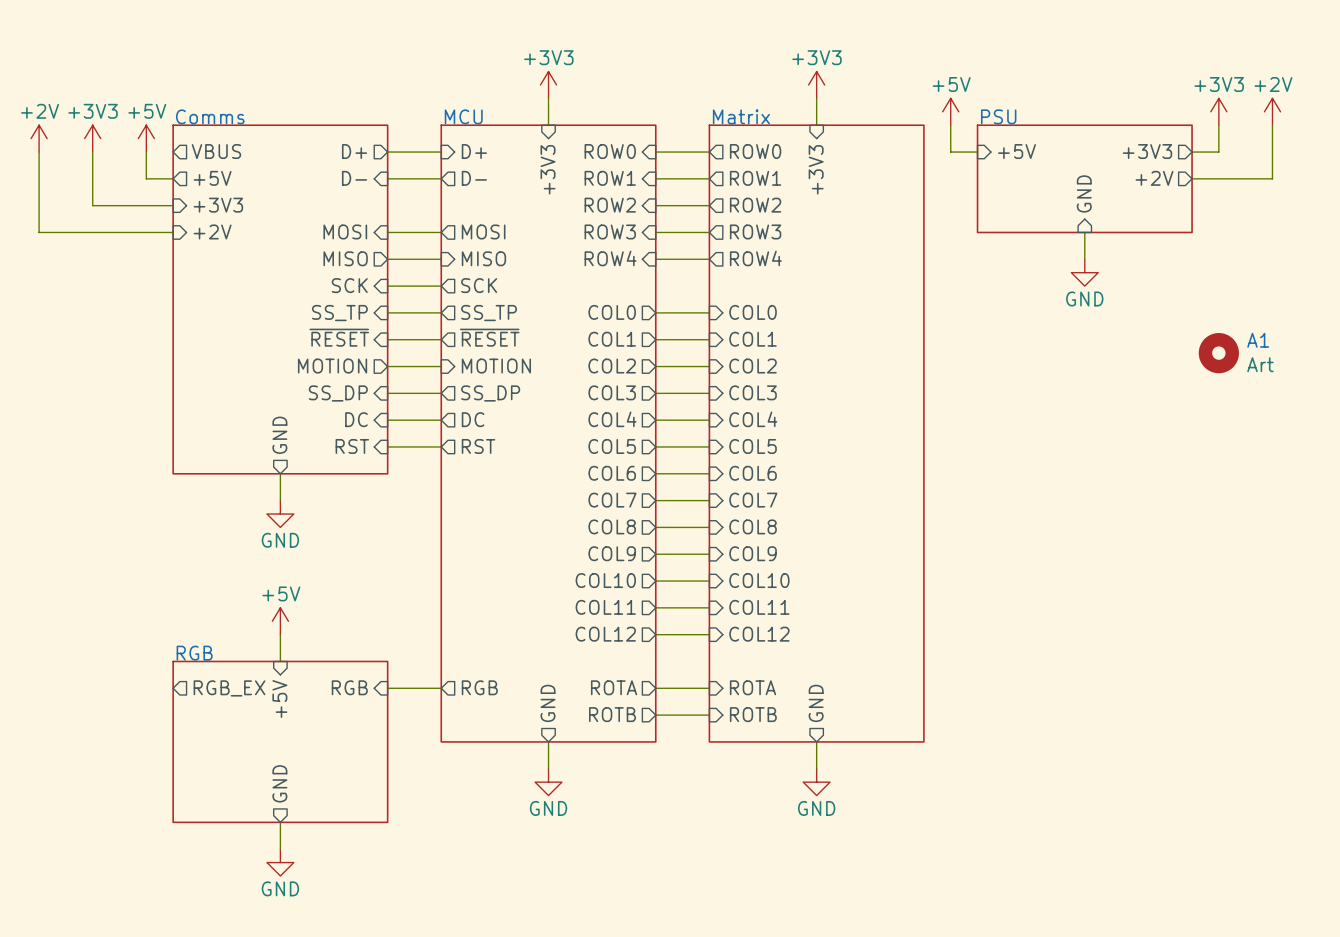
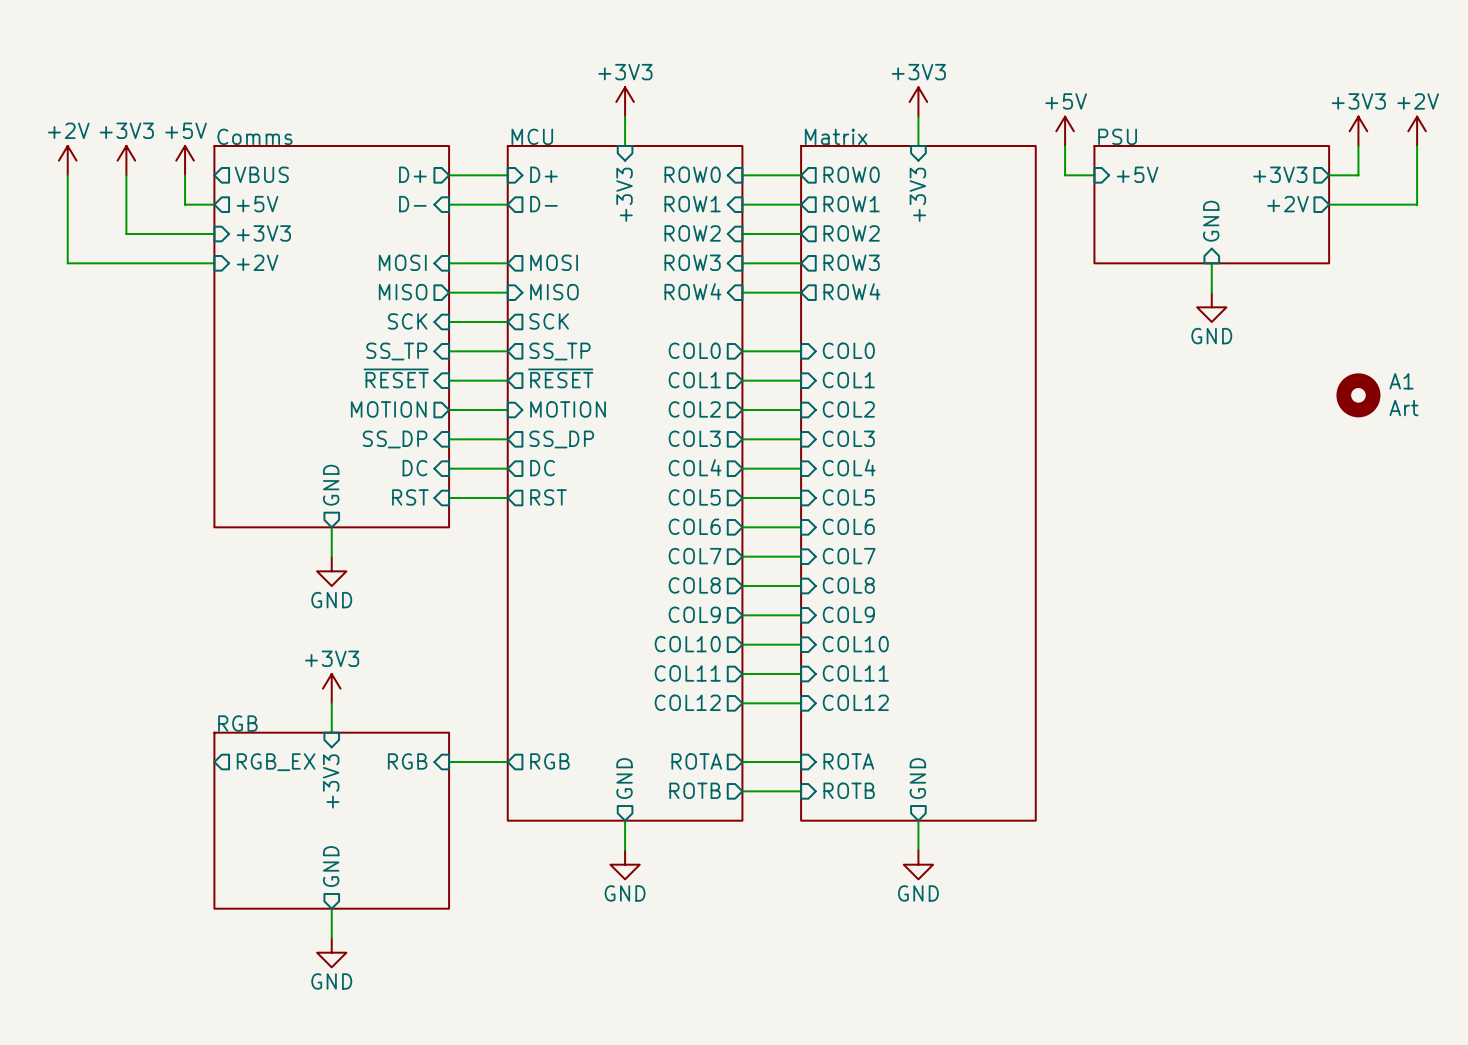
power symbol: +5V (280, 621) -> +3V3 (331, 688)
sheet pin: +5V (279, 699) -> +3V3 (331, 781)

